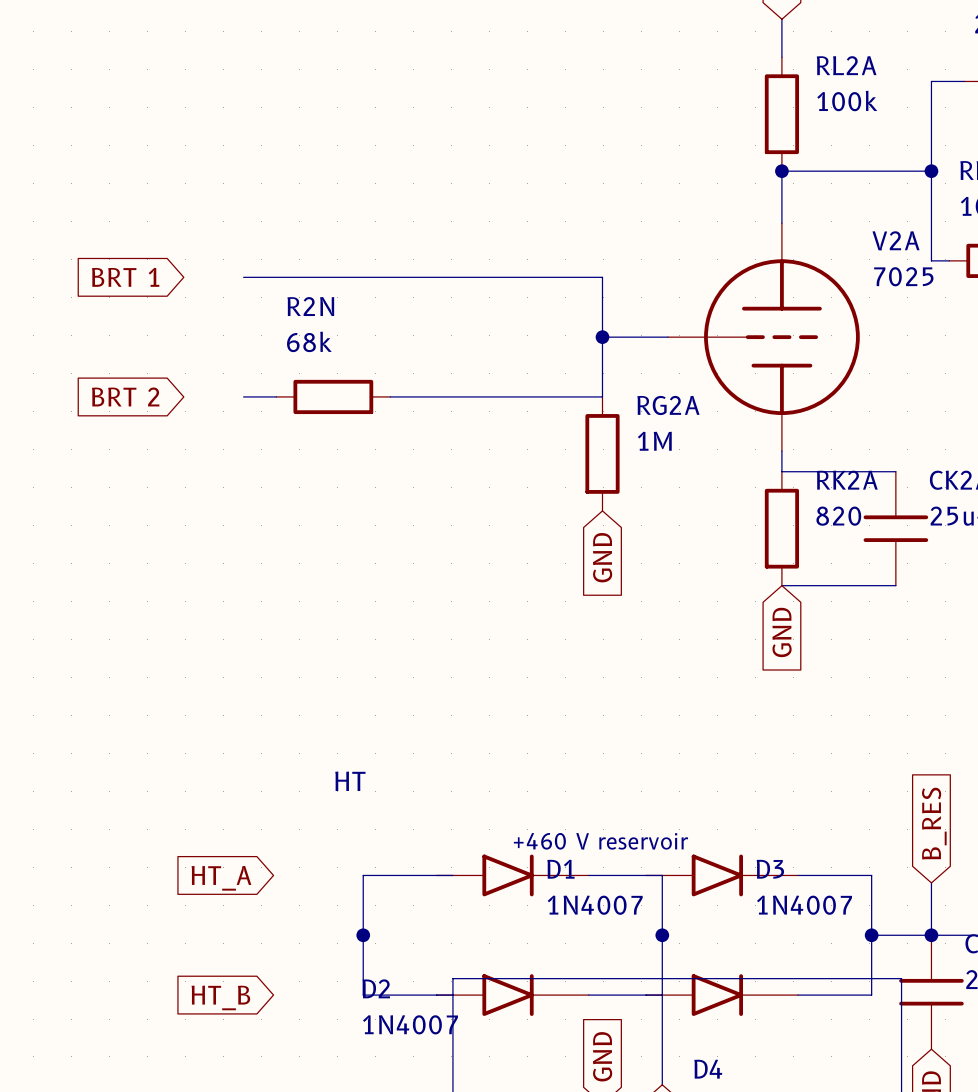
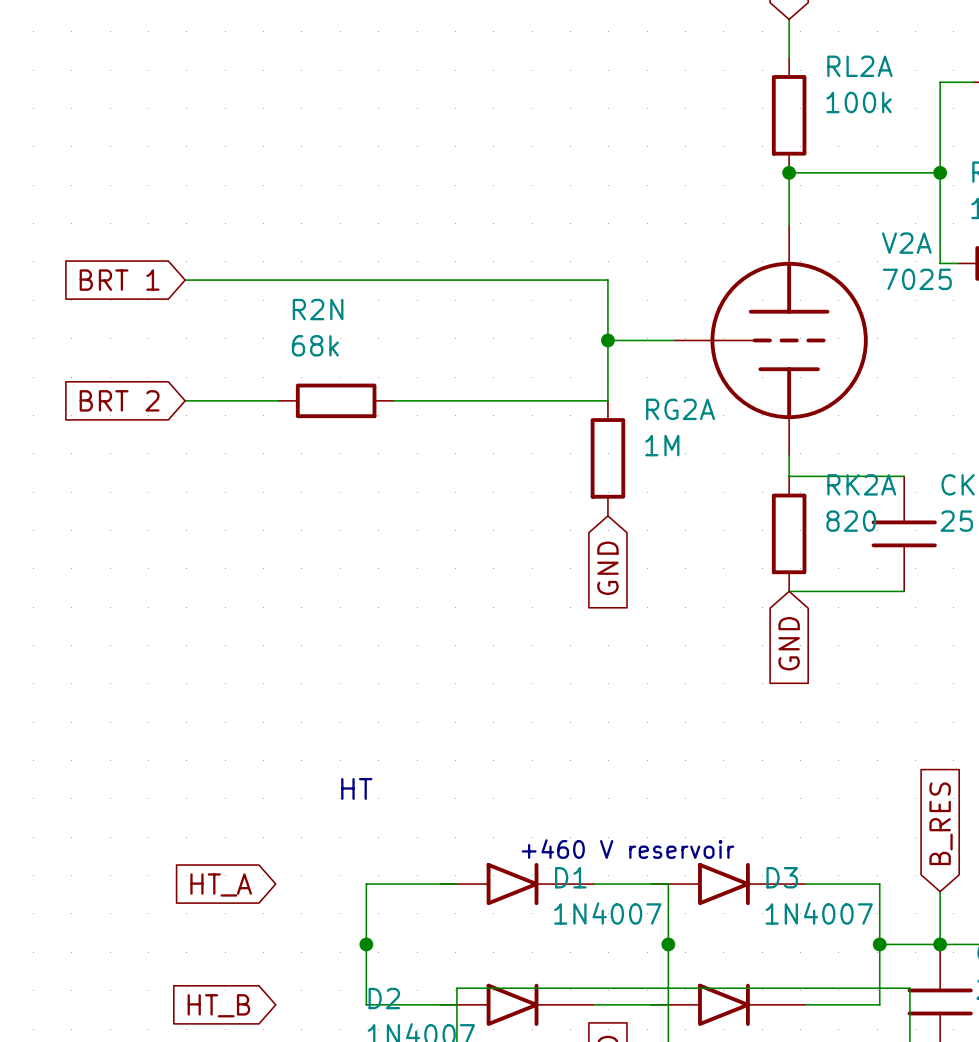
wire: none -> (185, 280) (245, 280)
wire: none -> (185, 400) (245, 400)

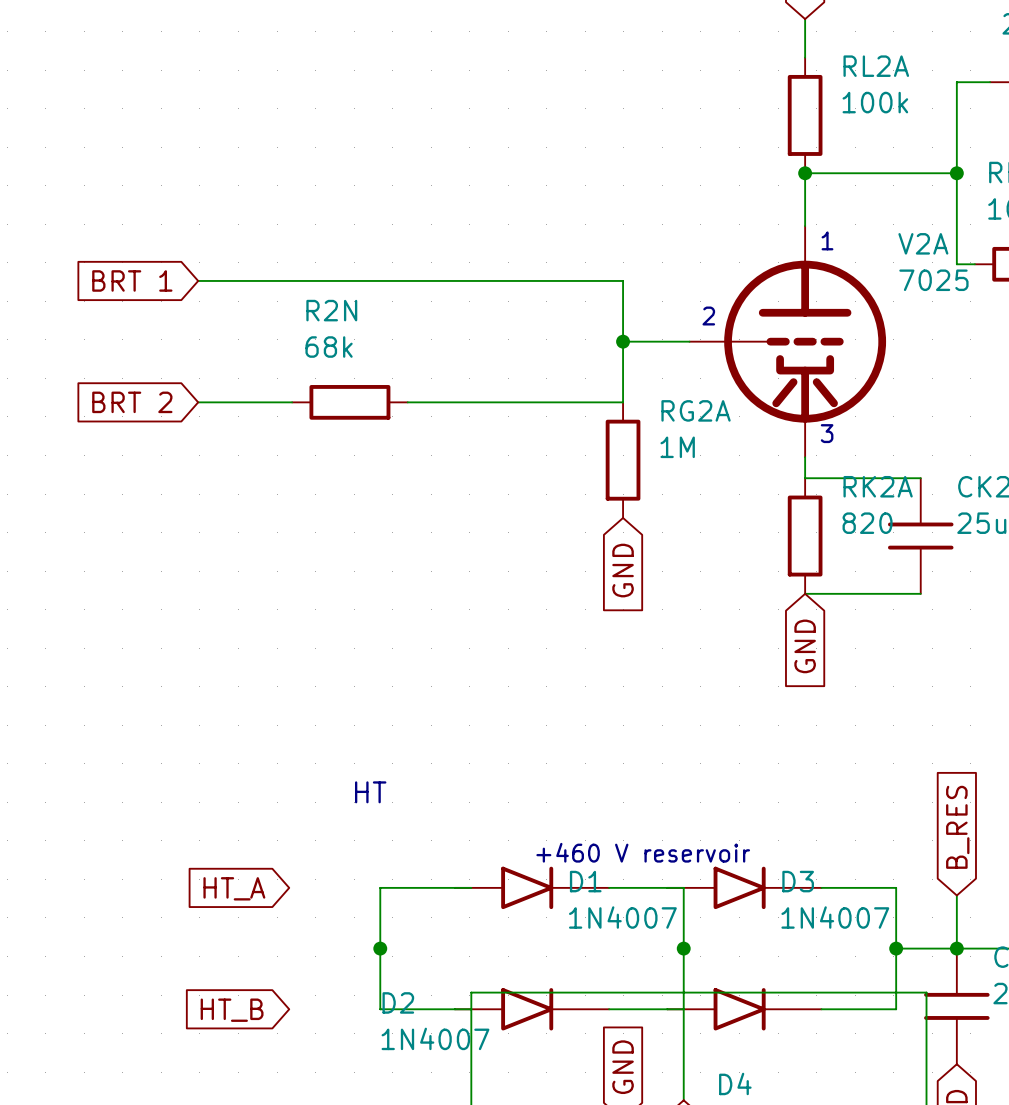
V2A symbol: [674, 225, 868, 456] -> [689, 226, 887, 458]
text: none -> 1 (827, 240)
text: none -> 2 (708, 316)
text: none -> 3 (827, 433)

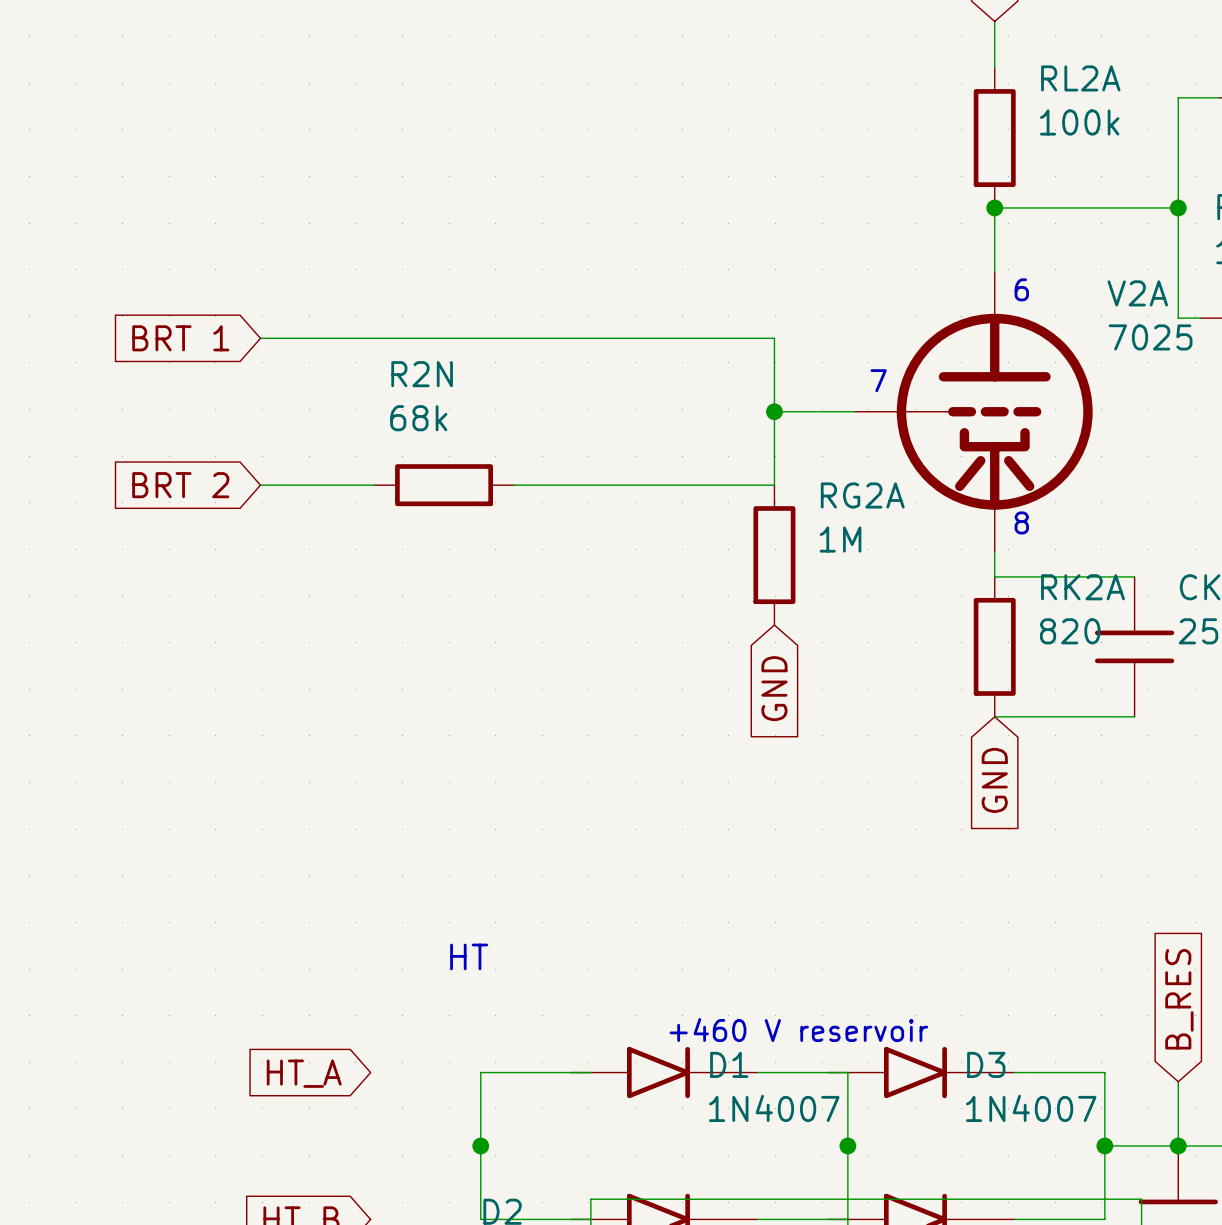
text: 1 (827, 240) -> 6 (1021, 289)
text: 2 (708, 316) -> 7 (878, 380)
text: 3 (827, 433) -> 8 (1021, 522)

